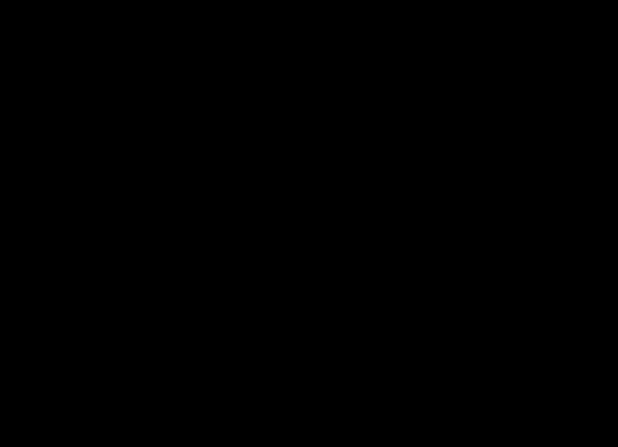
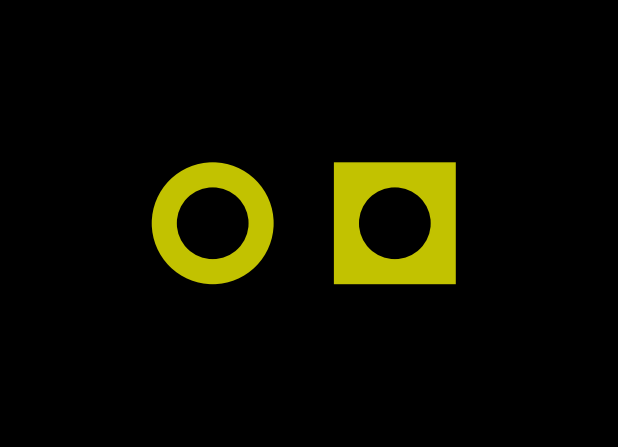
part: none -> (303, 223)

